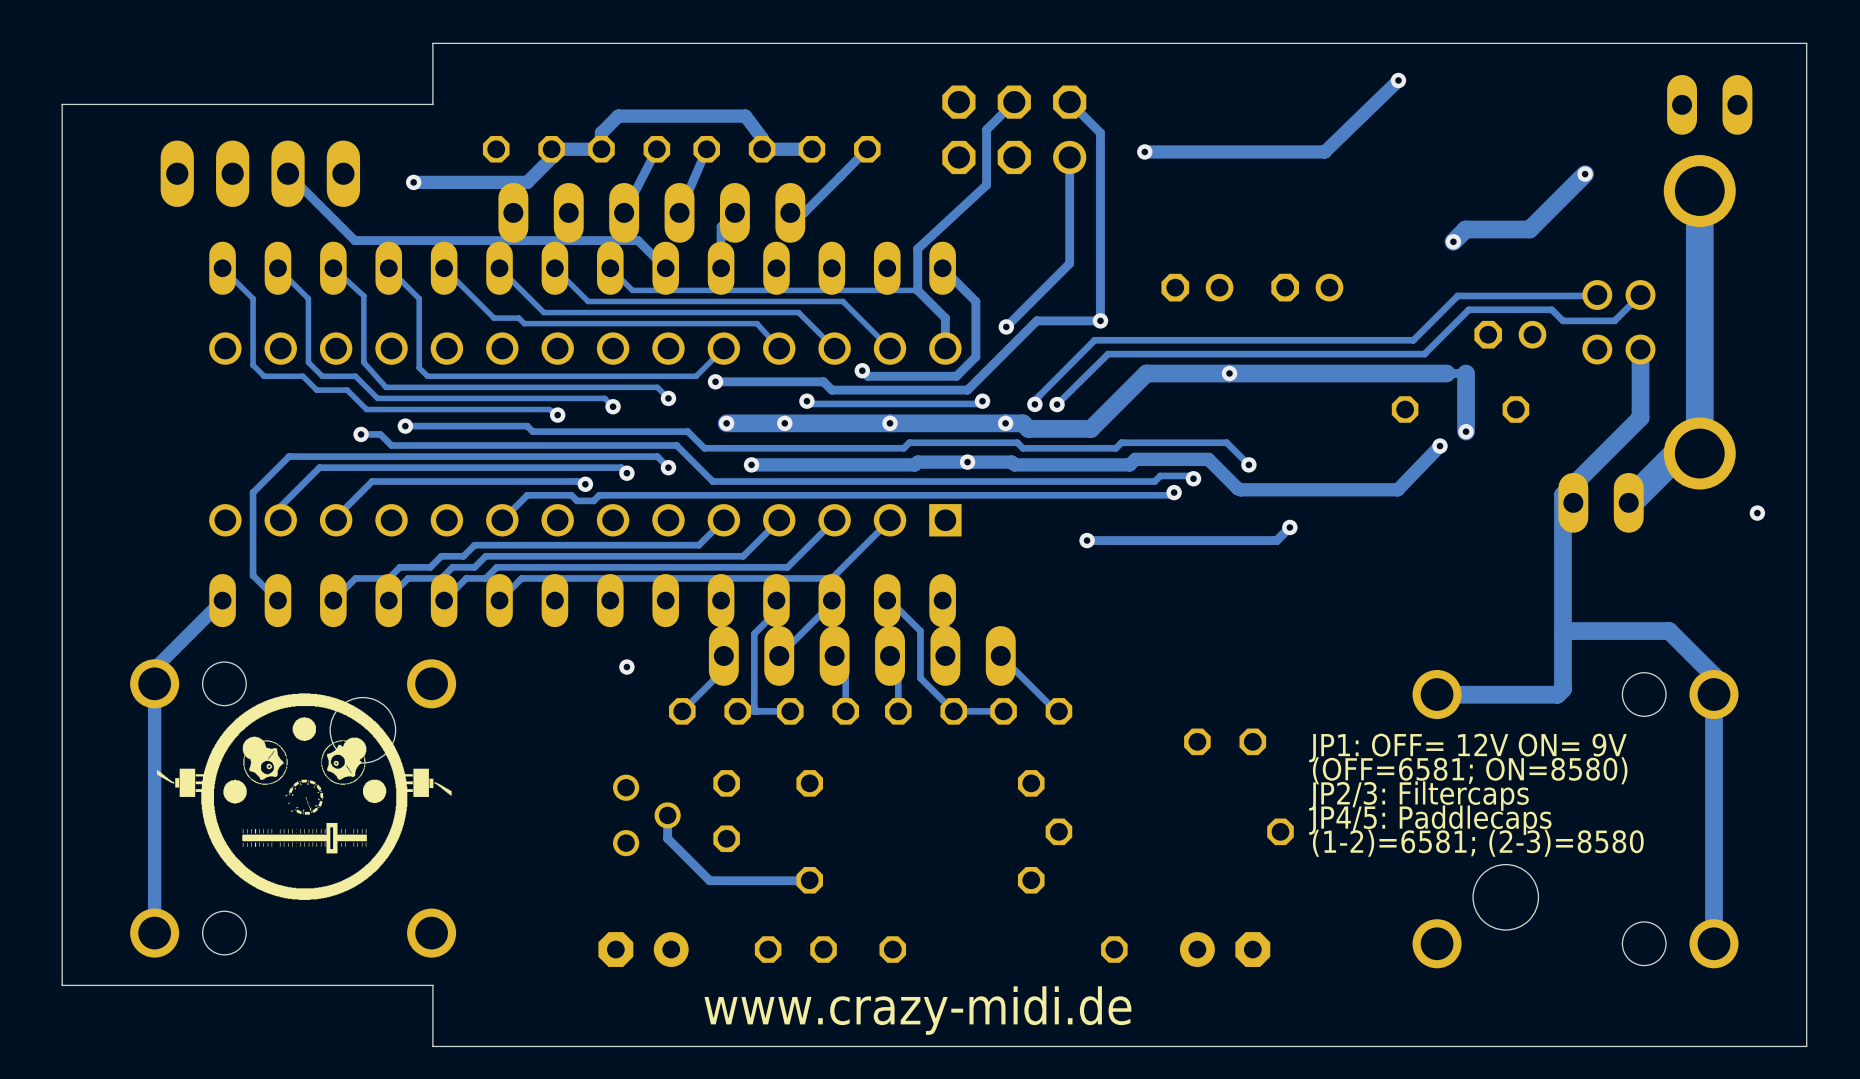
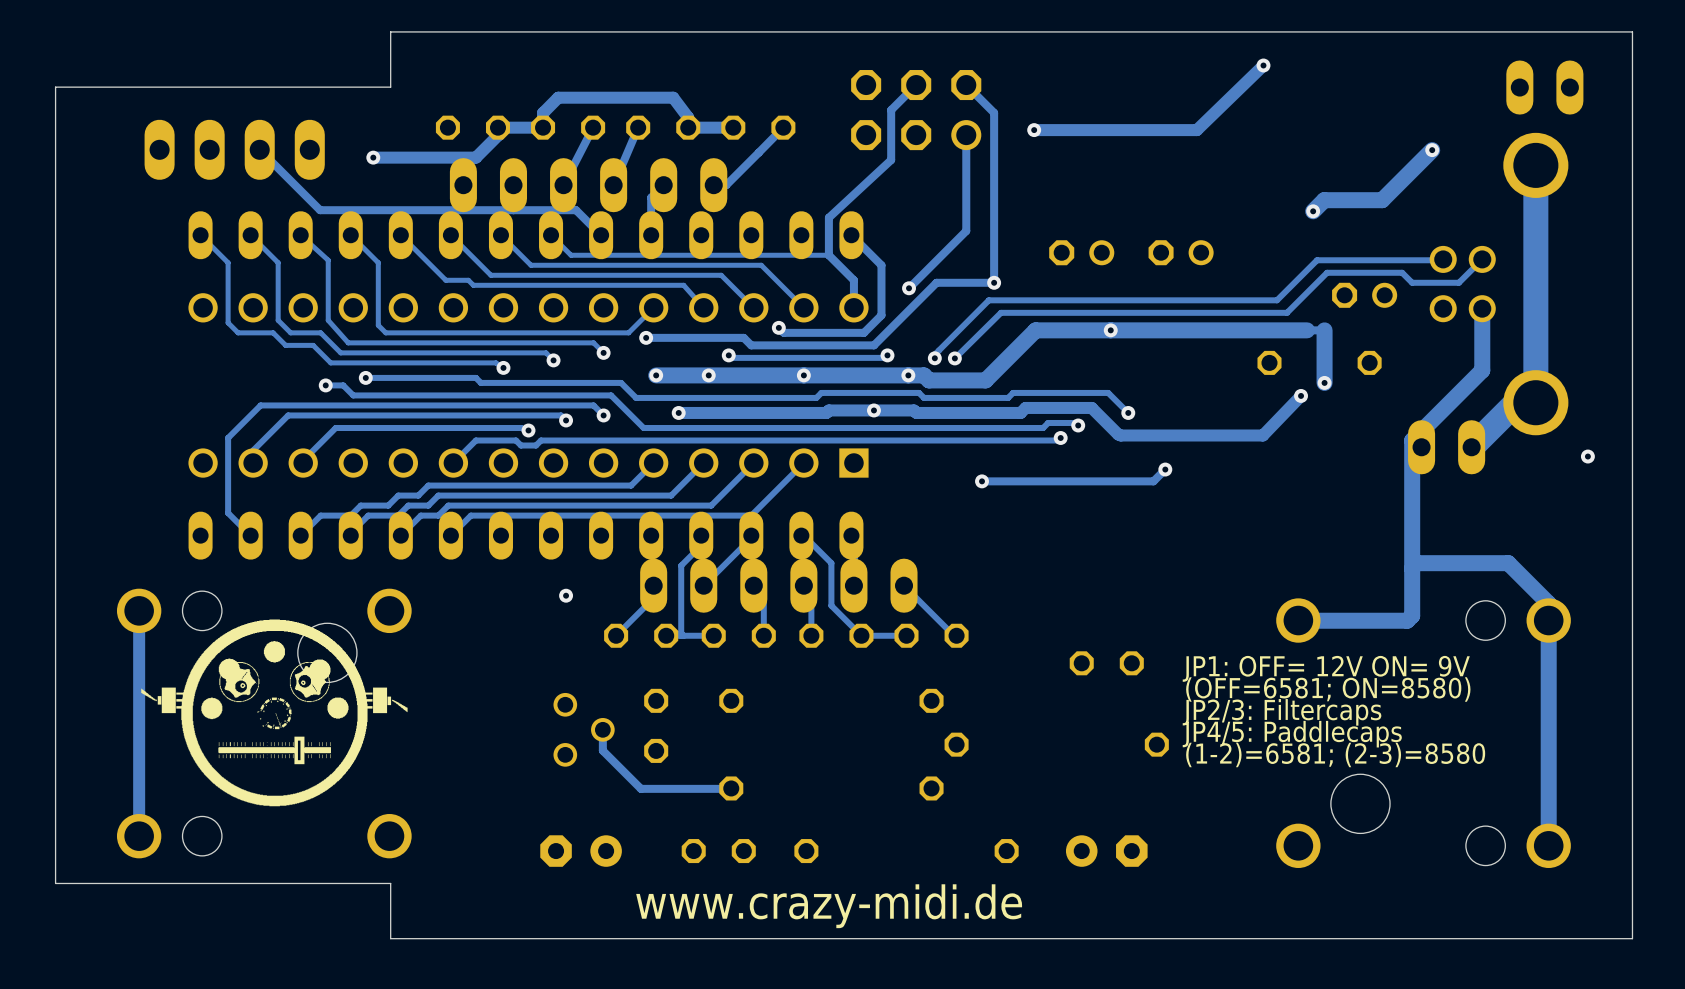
track: (222, 600) (154, 668) -> none

